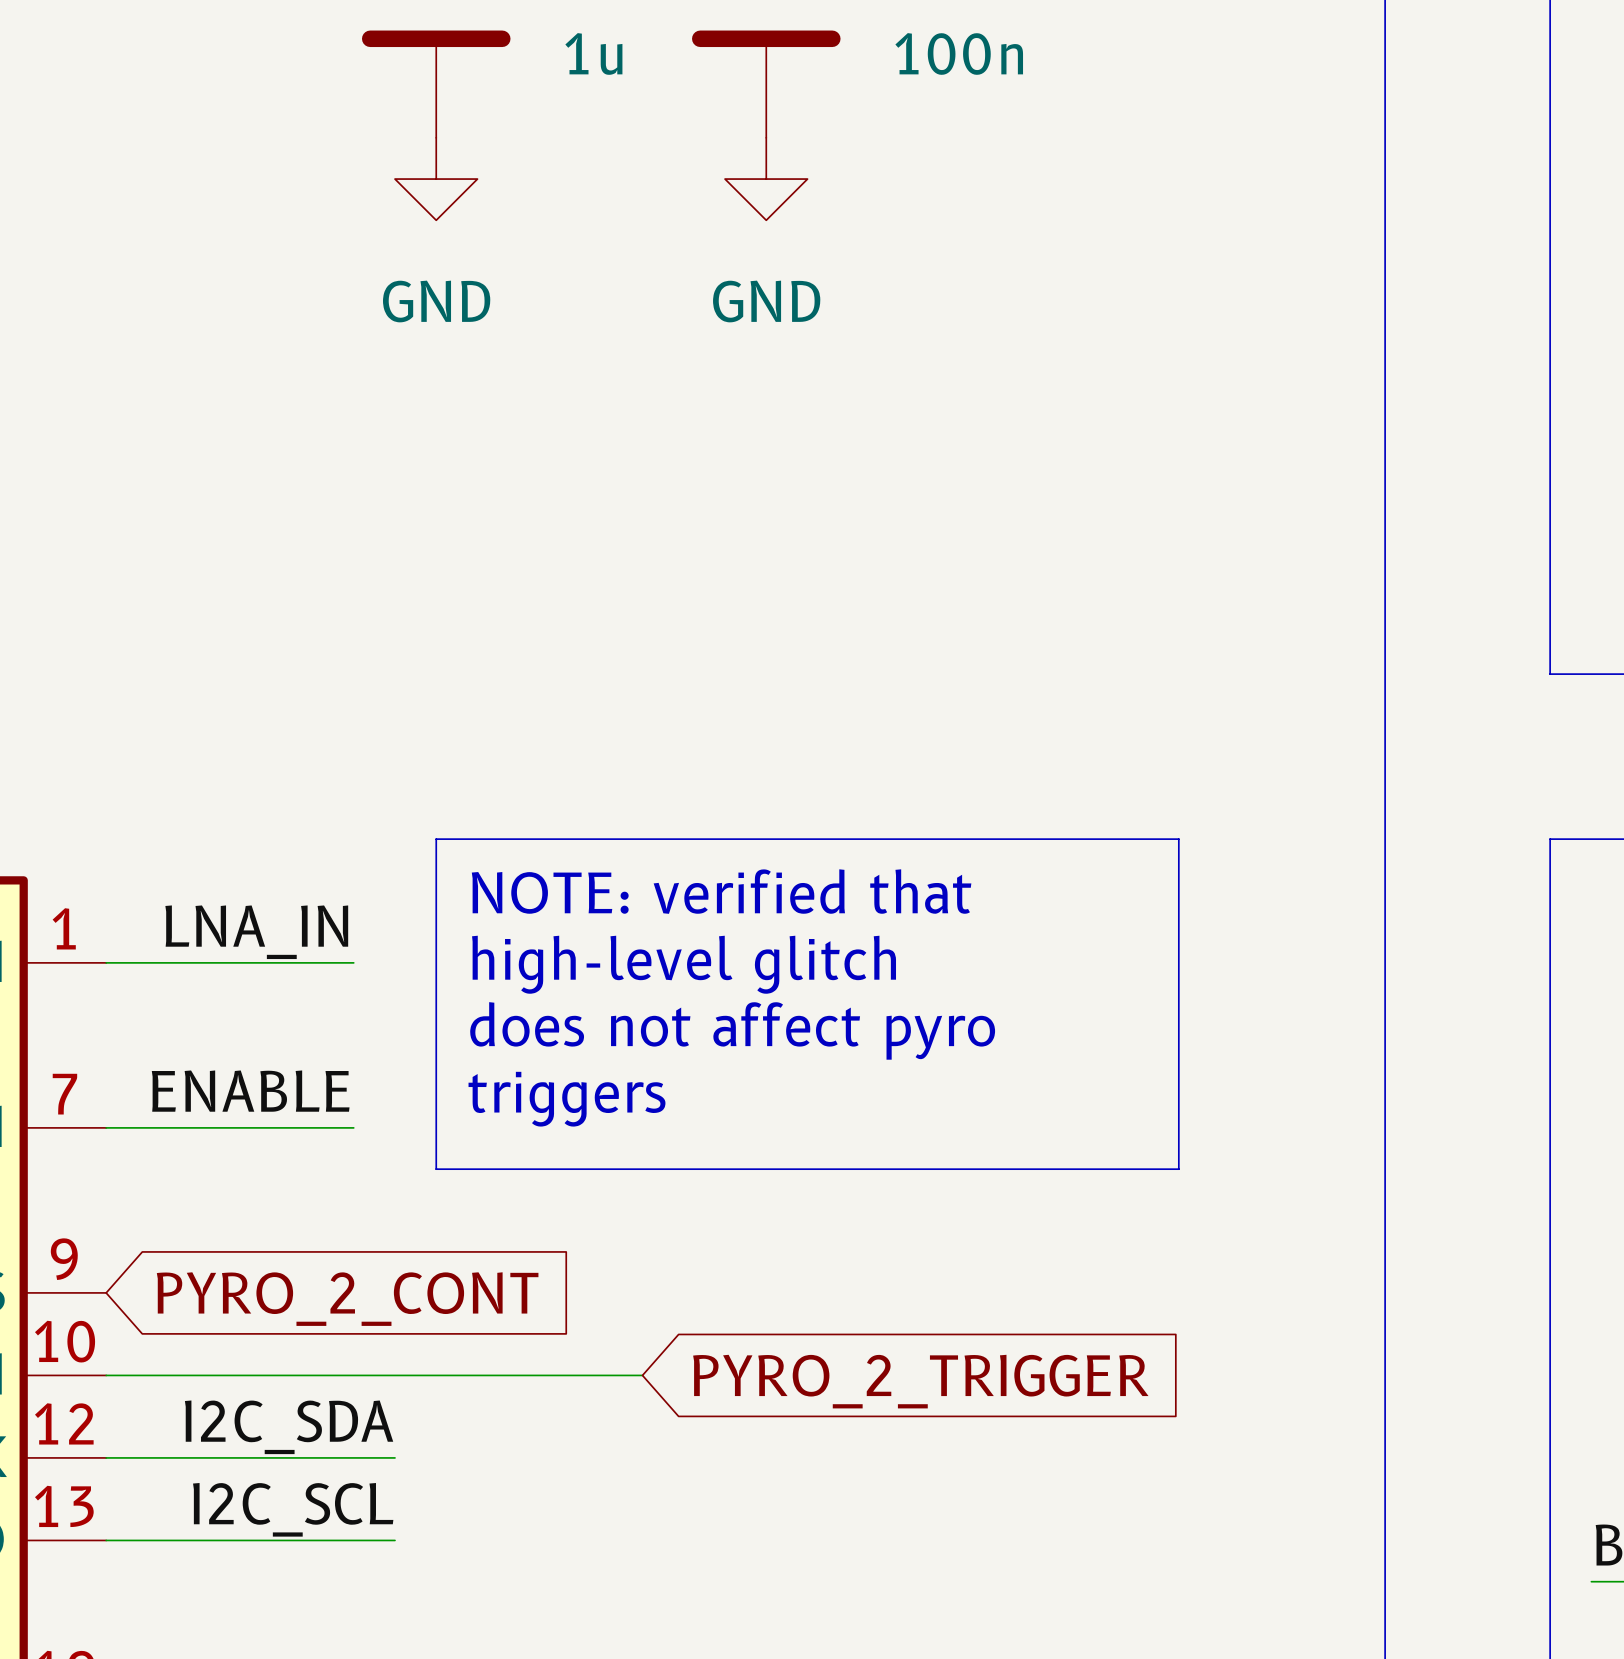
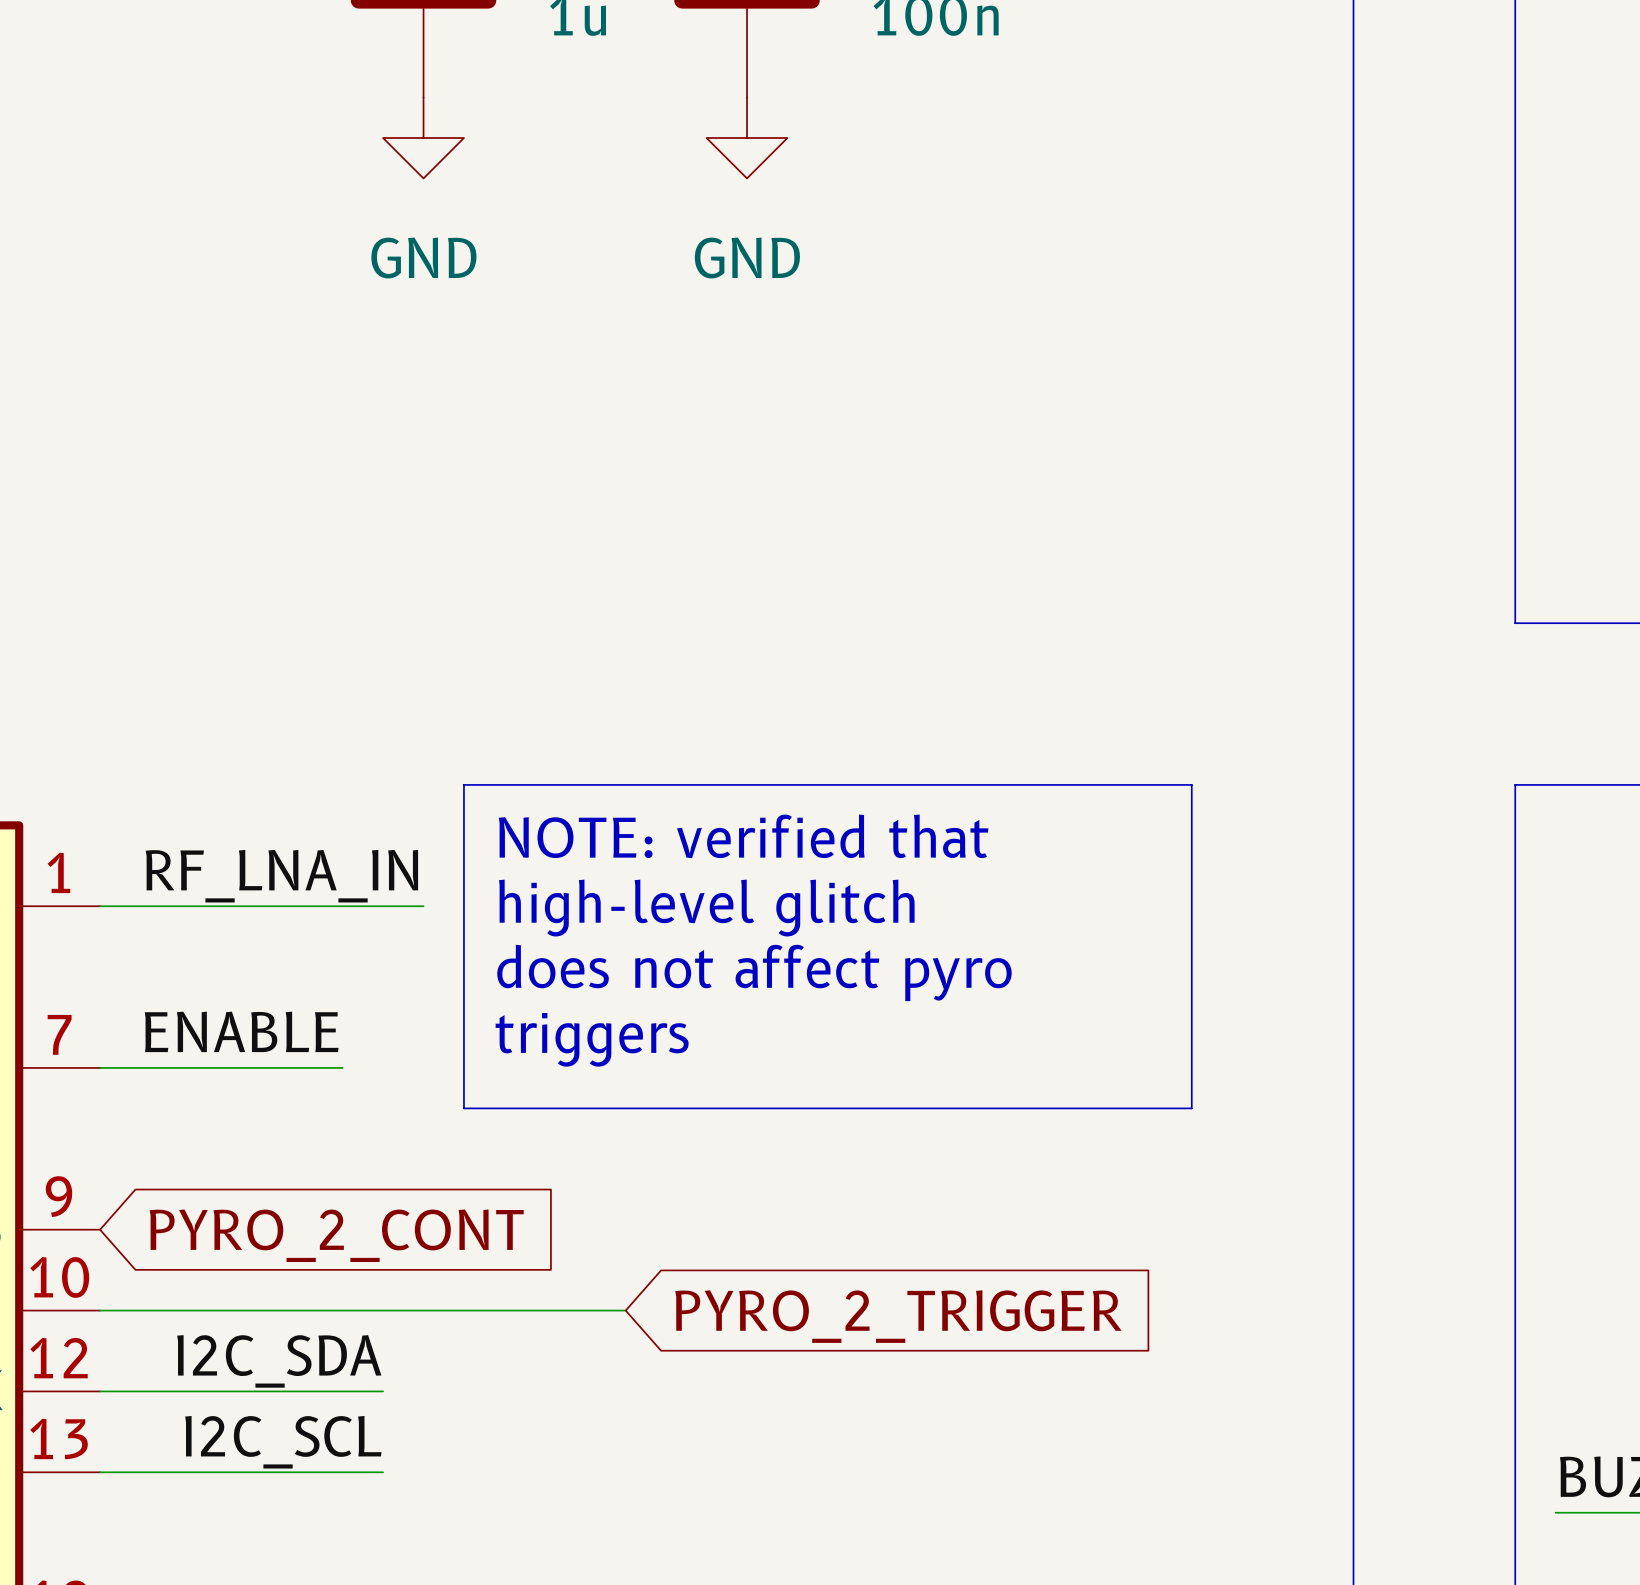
line: (477, 839) (436, 839) (436, 1169) (477, 1169) -> (463, 784) (463, 1108)
line: (1178, 839) (1178, 1169) -> (1151, 784) (1191, 784) (1191, 1108) (1151, 1108)
text position: NOTE: verified that (721, 891) -> NOTE: verified that (743, 836)
label: LNA_IN (256, 932) -> RF_LNA_IN (281, 876)
wire: none -> (342, 906) (423, 906)
text position: high-level glitch (684, 964) -> high-level glitch (706, 908)
text position: does not affect pyro (732, 1030) -> does not affect pyro (754, 972)
text position: triggers (566, 1099) -> triggers (592, 1039)

